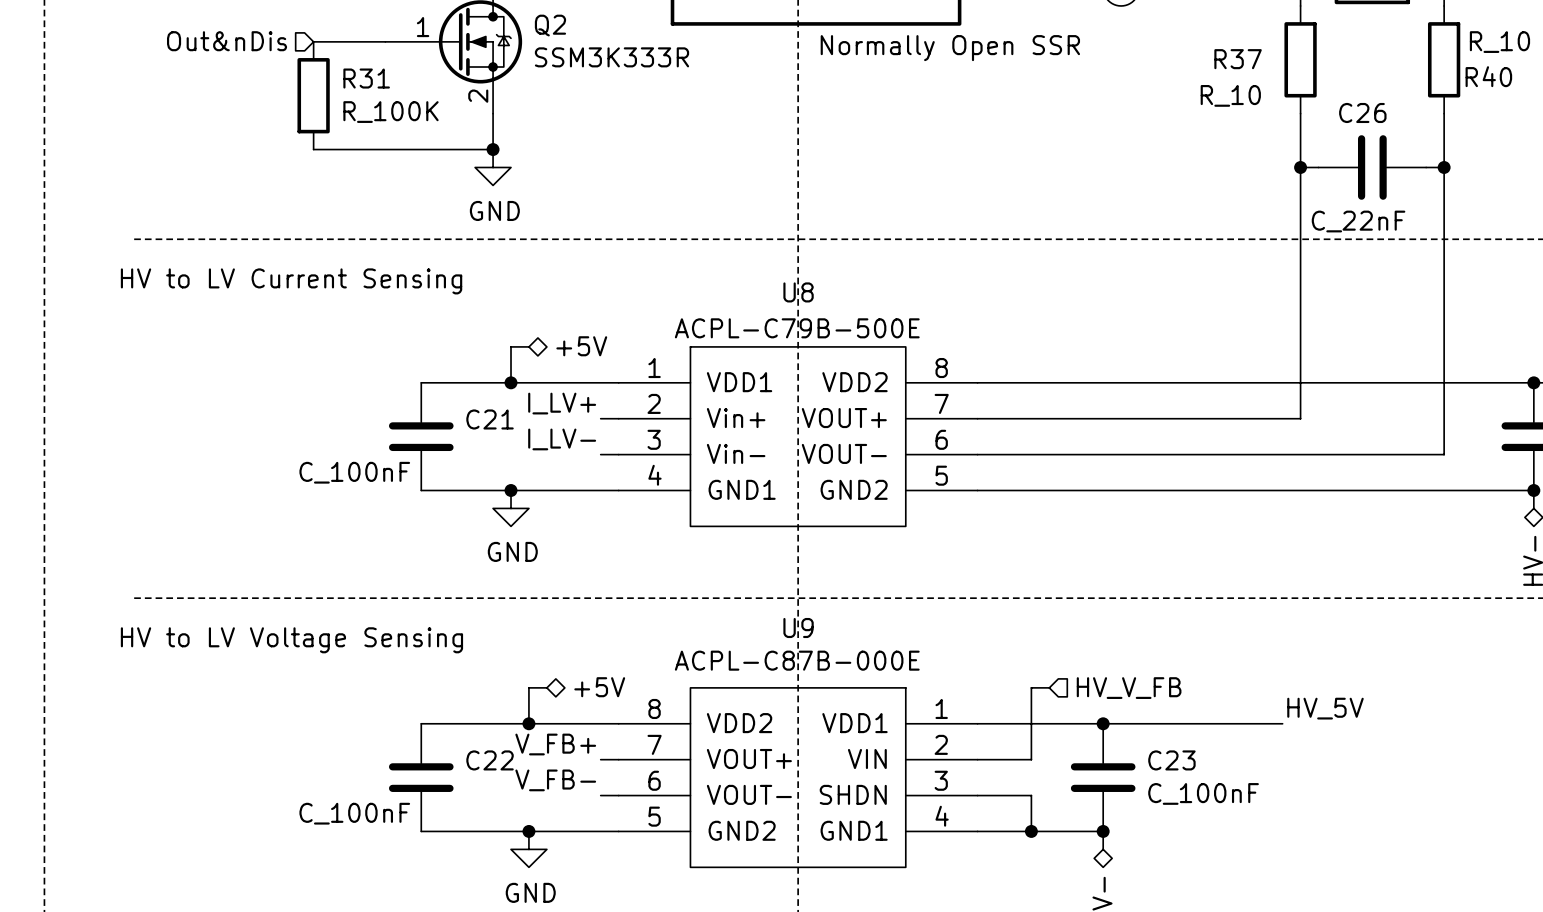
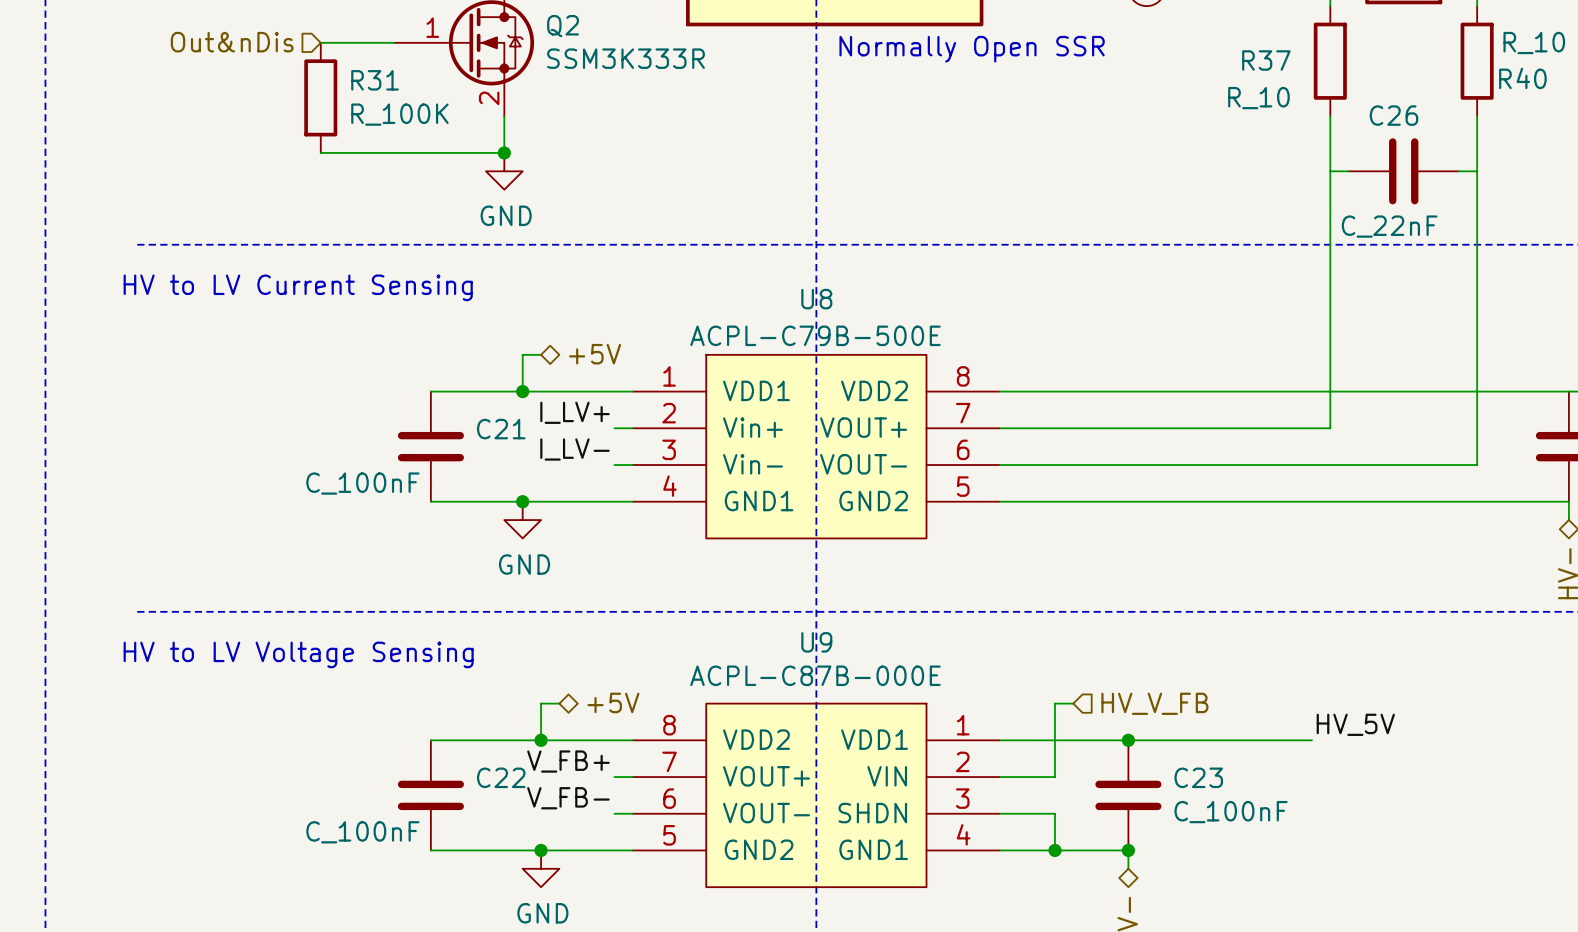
junction: (1300, 167) -> none
junction: (1444, 167) -> none
junction: (1533, 382) -> none
junction: (1533, 490) -> none

